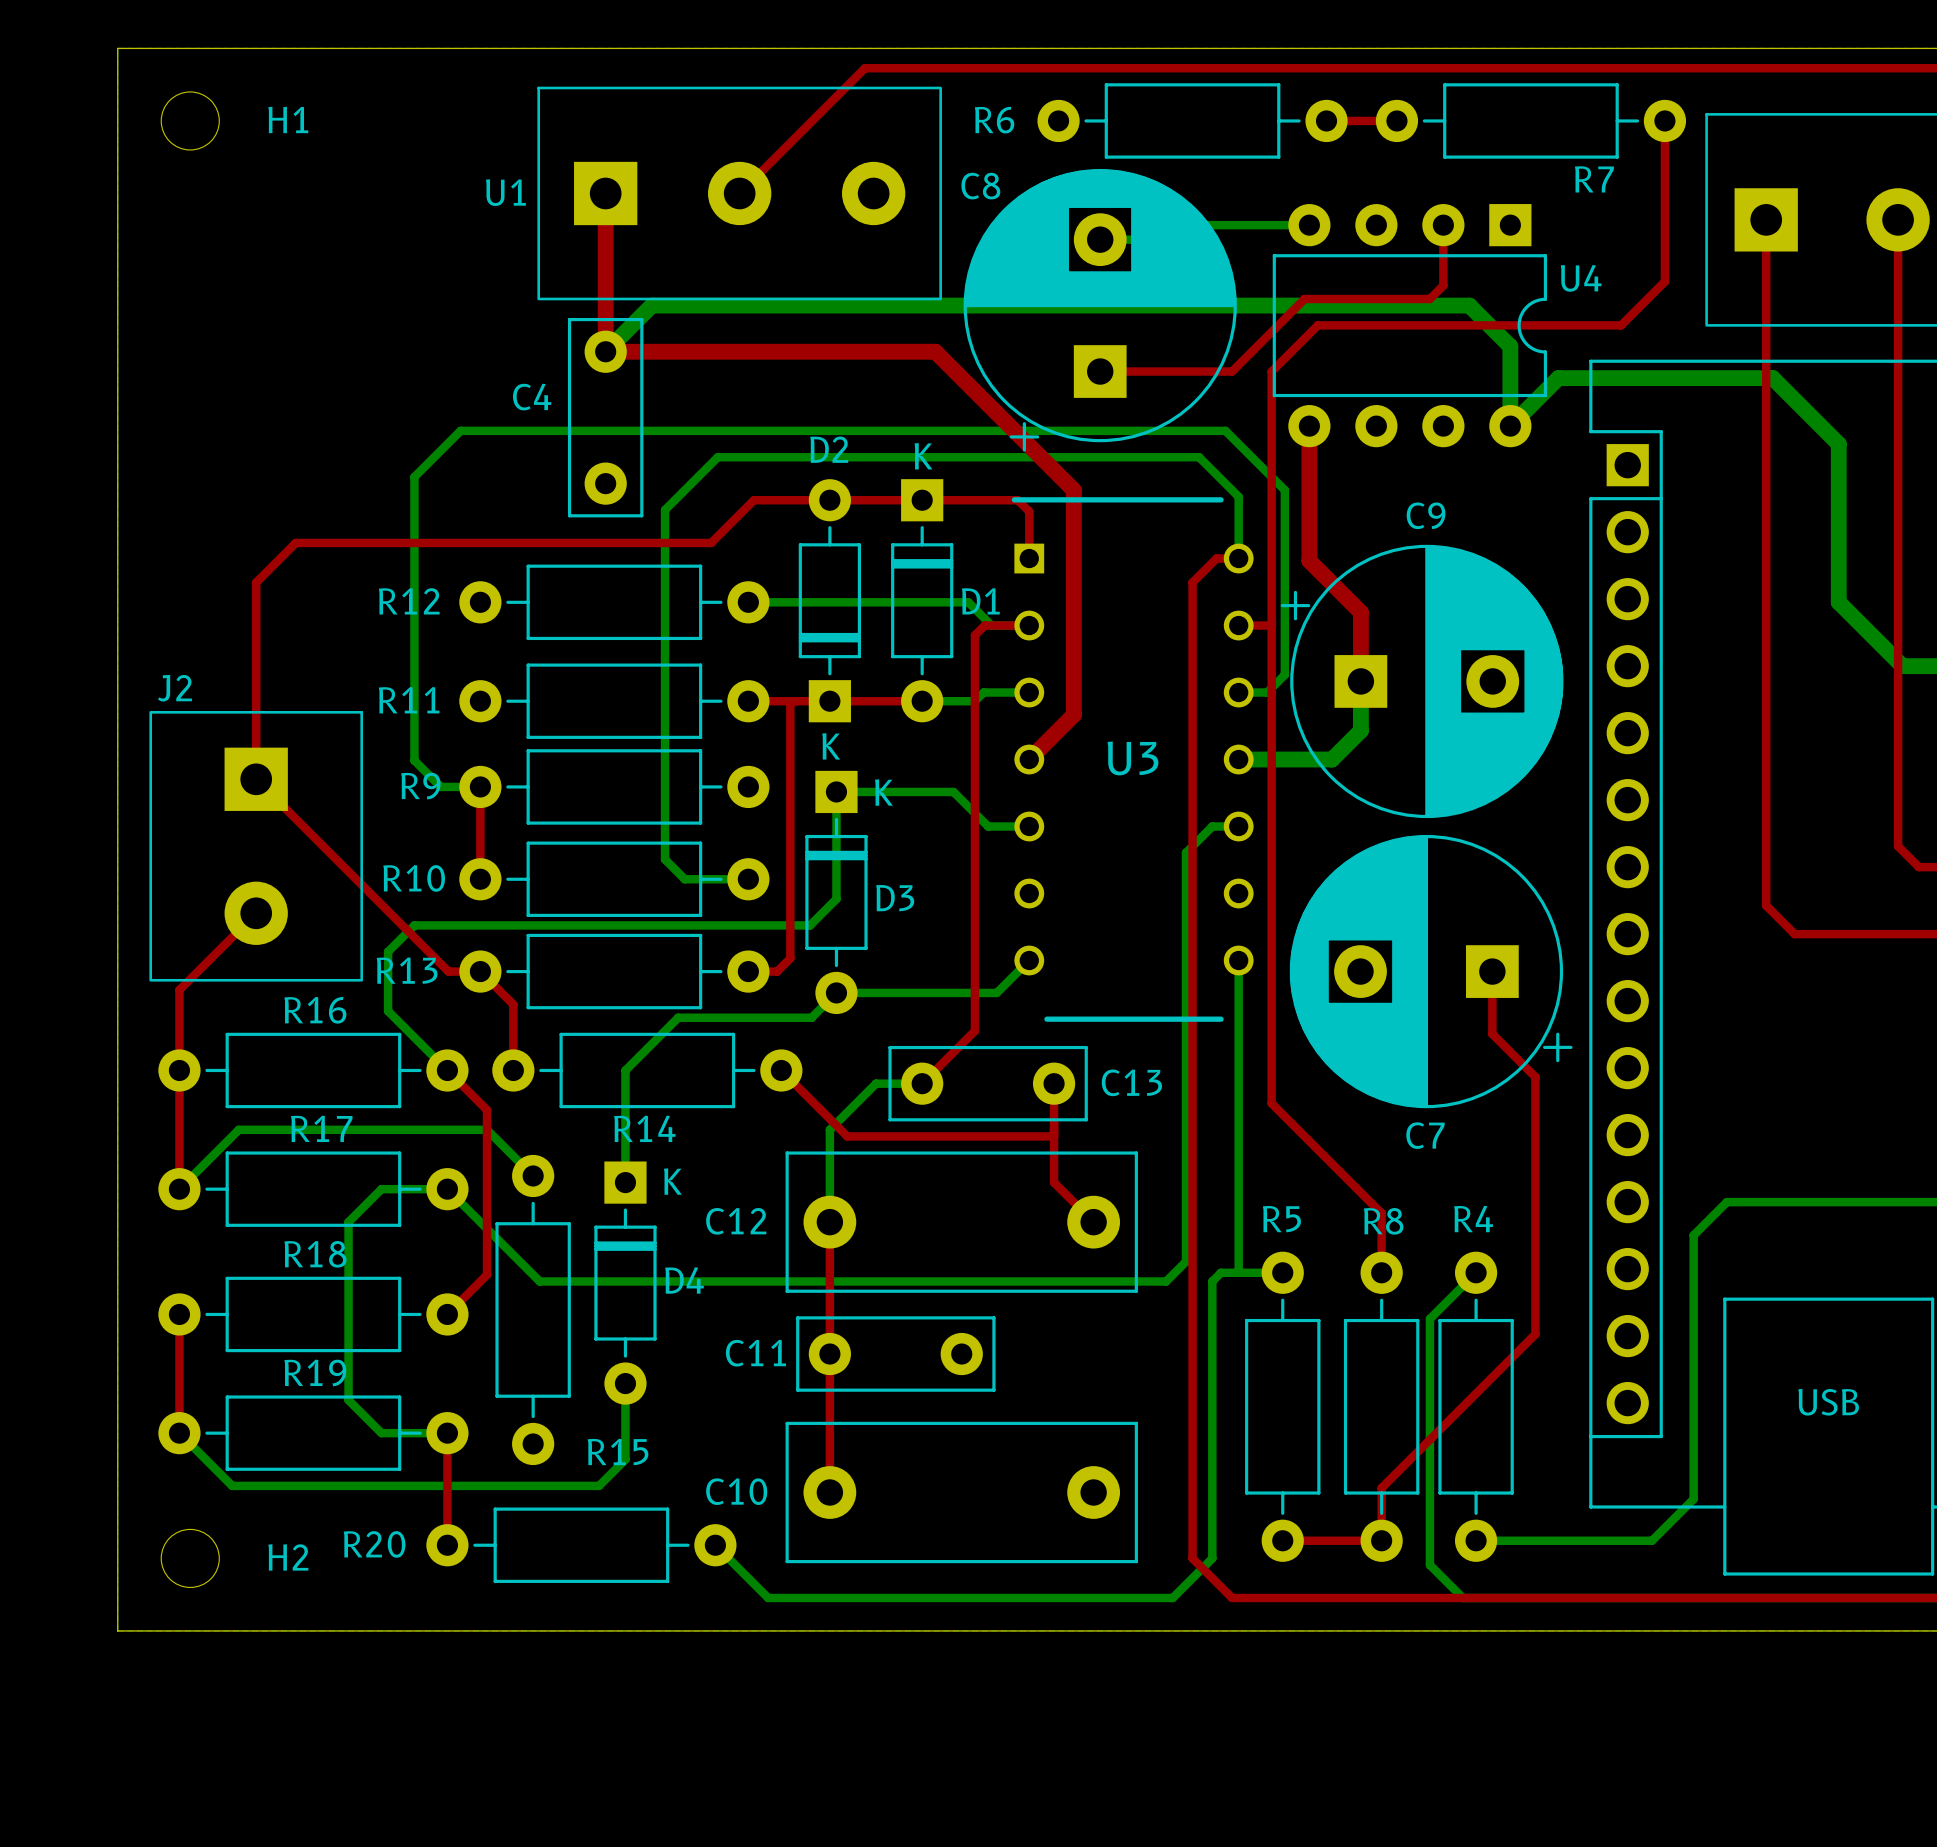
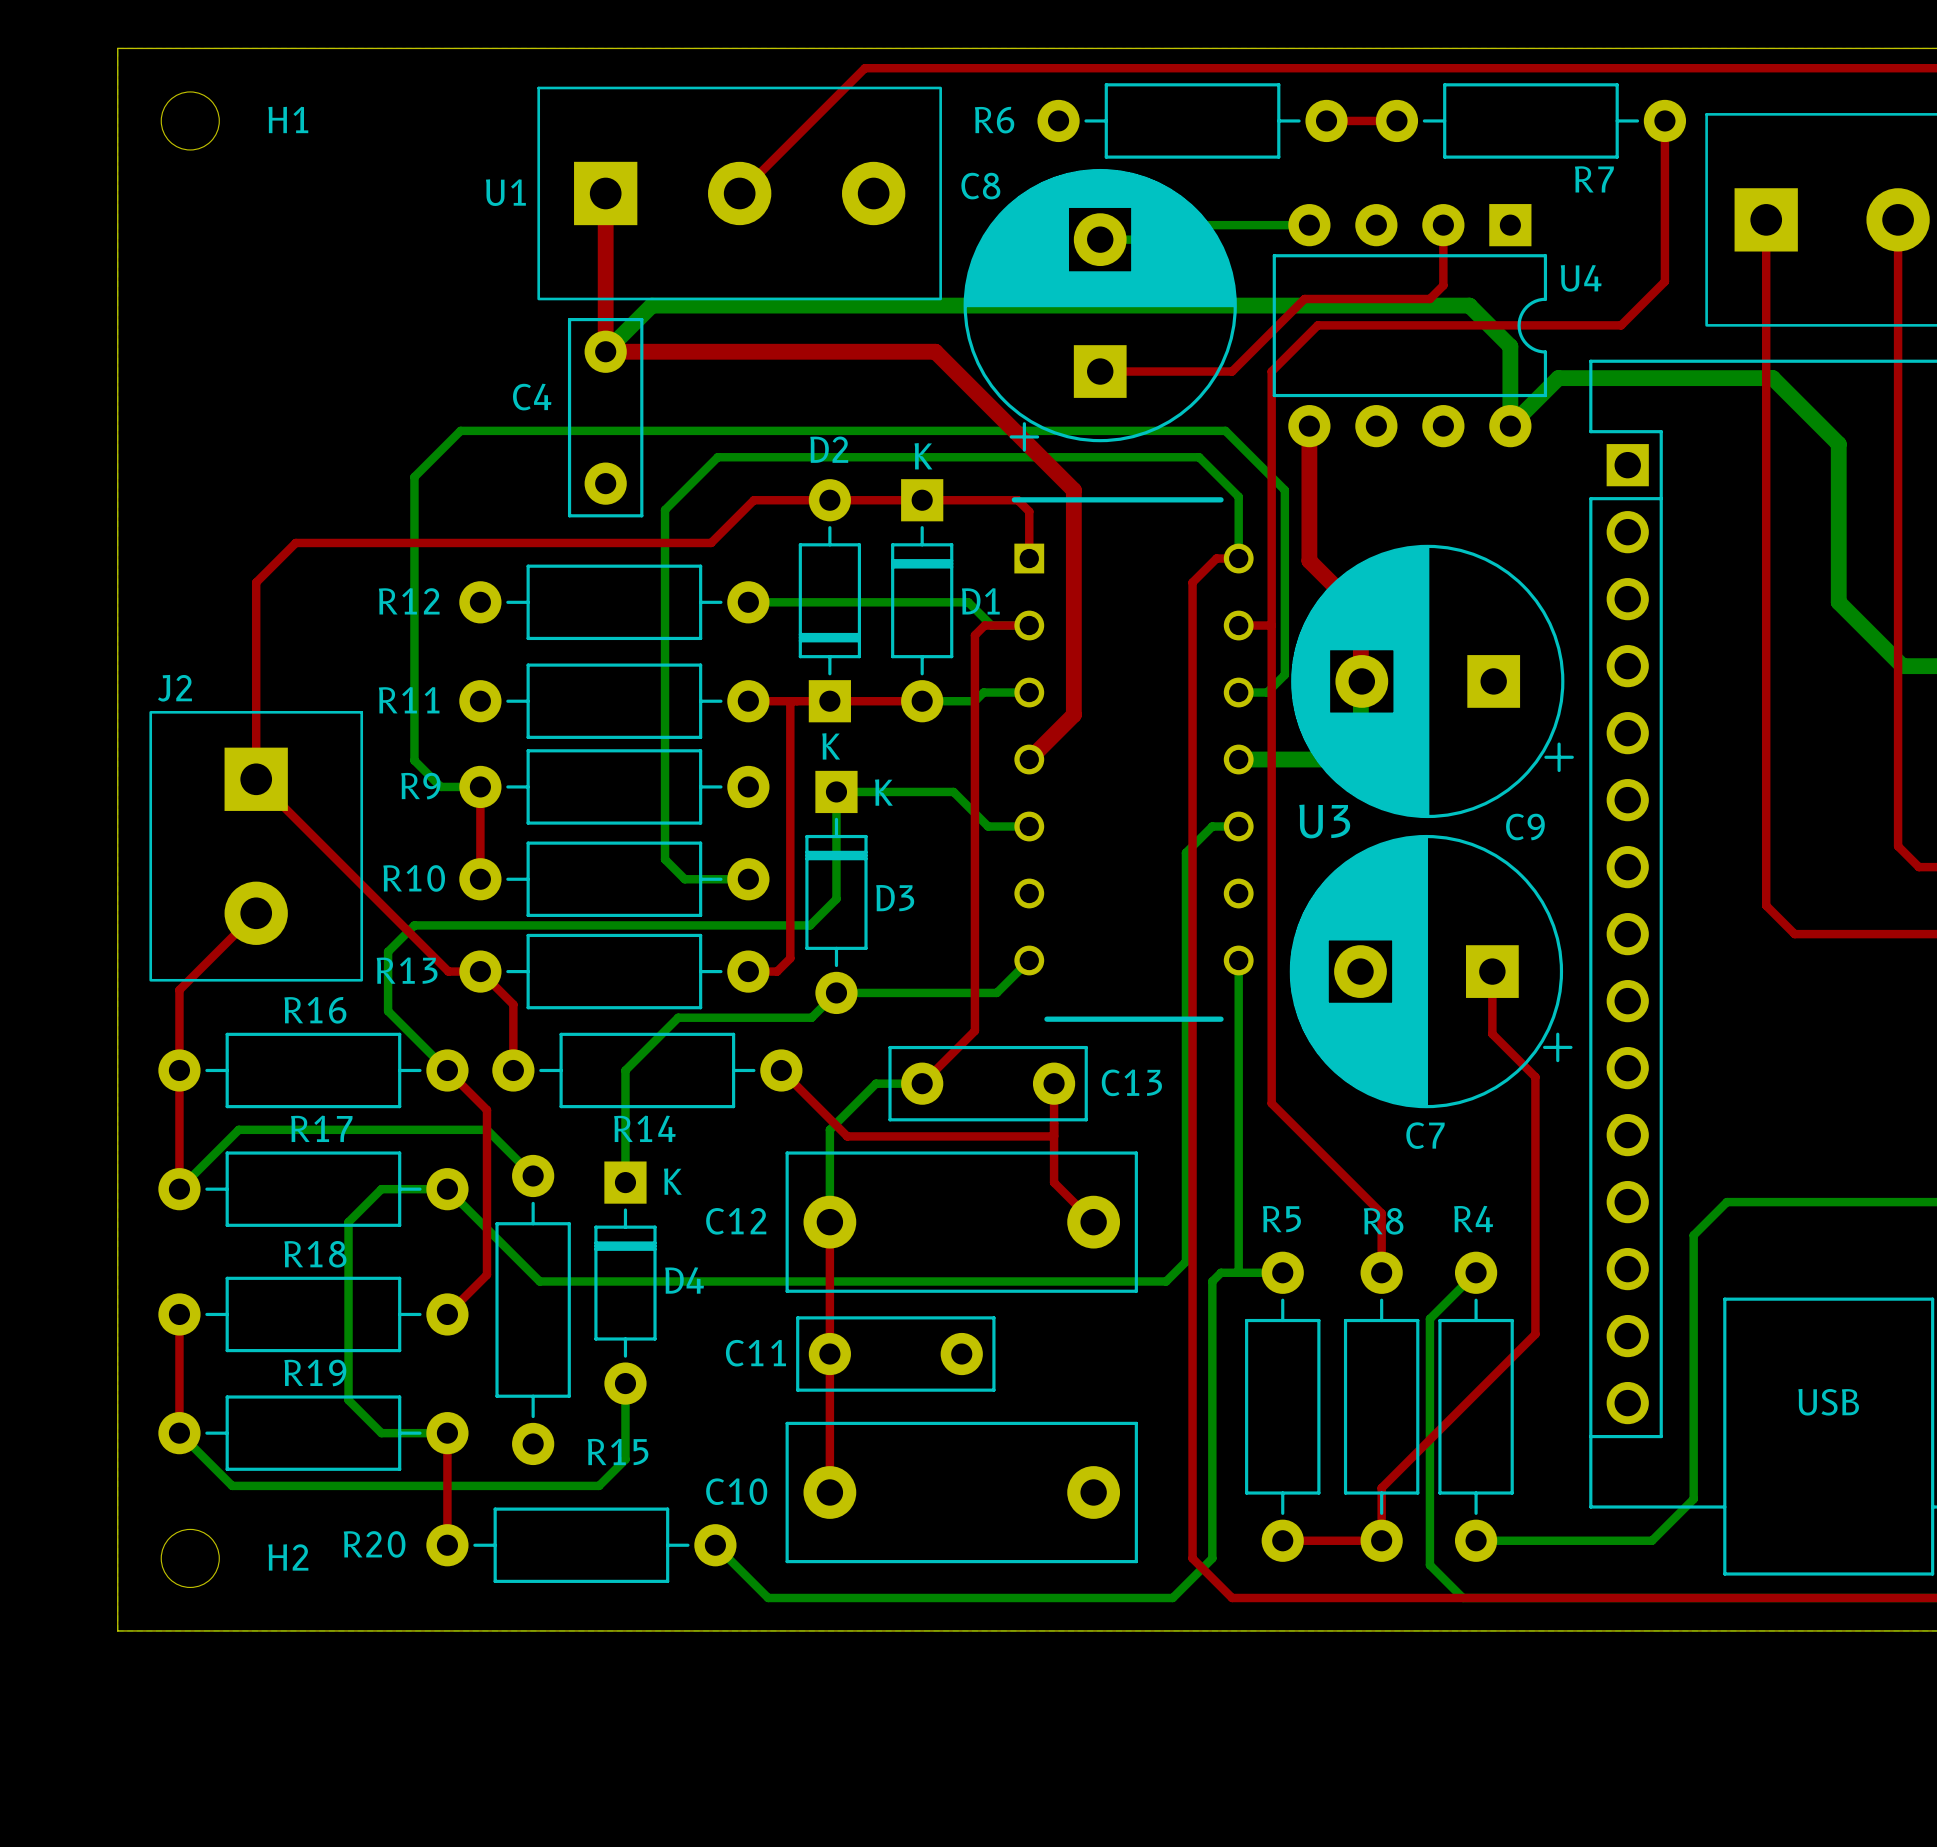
C9 name position: C9 (1426, 515) -> C9 (1525, 827)
C9 rotation: 0° (1422, 681) -> 180° (1432, 681)
U3 name position: U3 (1132, 758) -> U3 (1324, 821)

